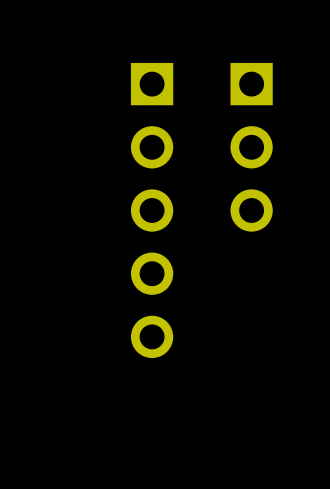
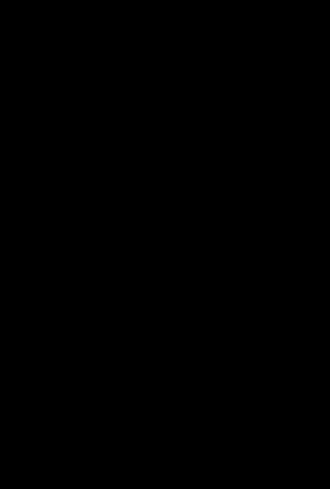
part: (251, 147) -> none
part: (152, 210) -> none

